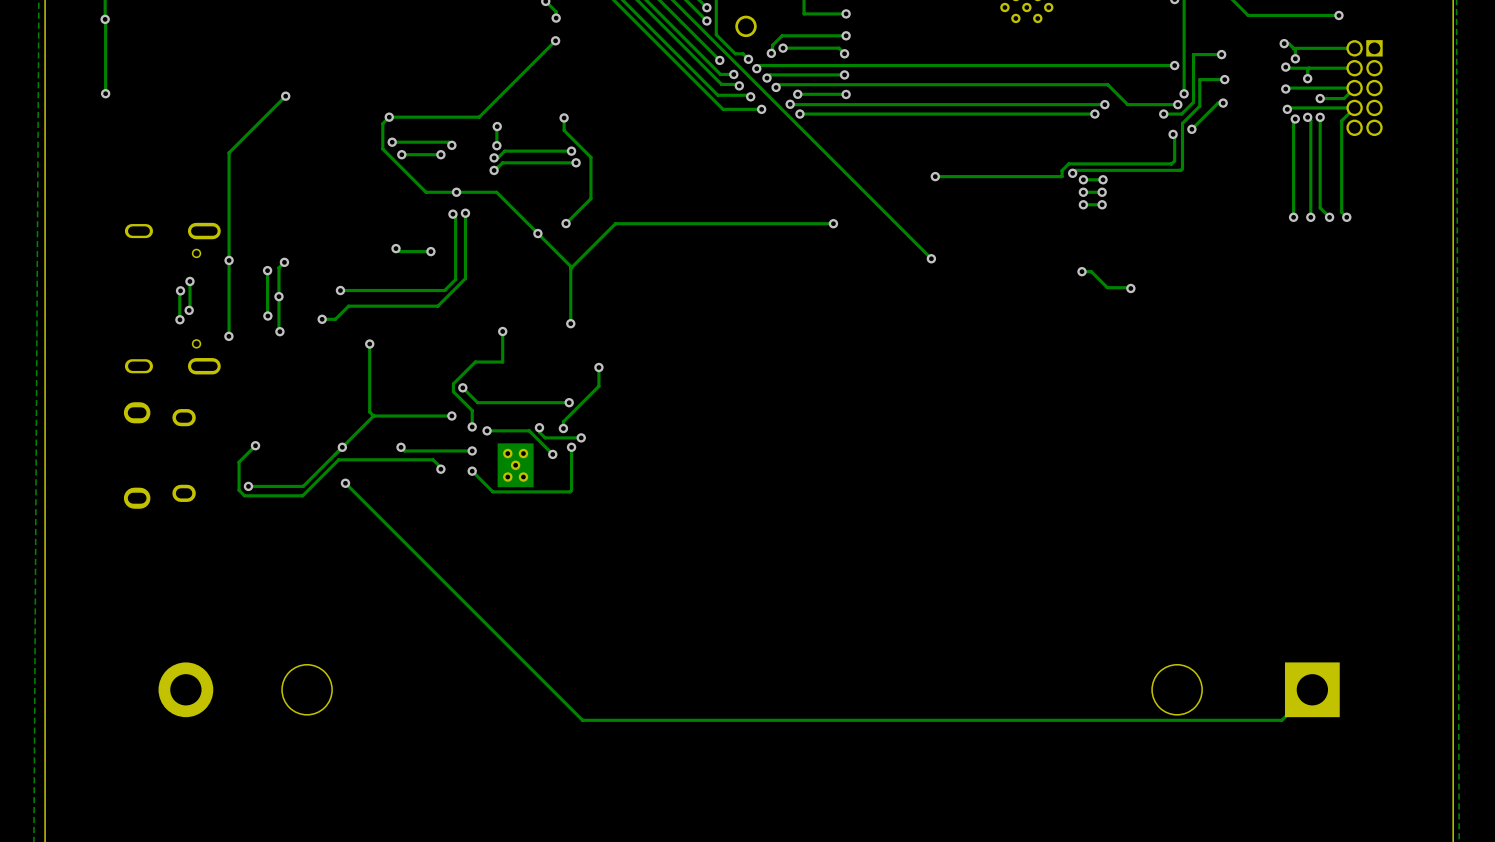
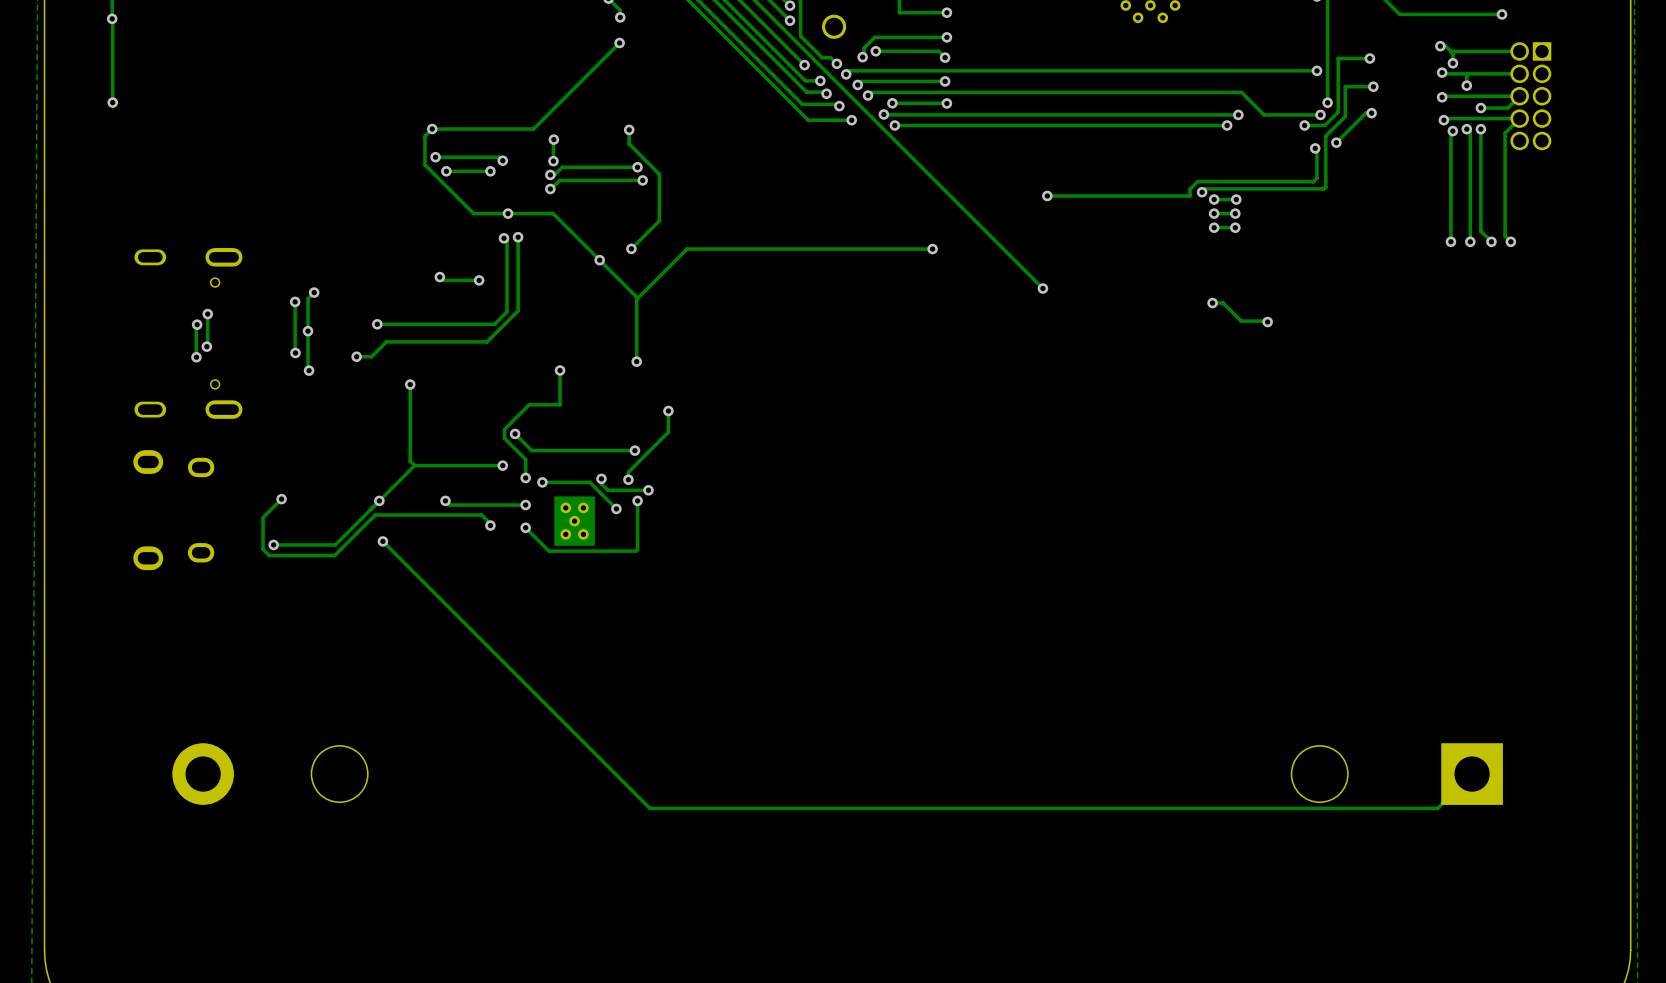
track: (285, 96) (229, 152) (229, 333) -> none
via: (285, 96) -> none
via: (229, 260) -> none
via: (228, 336) -> none

